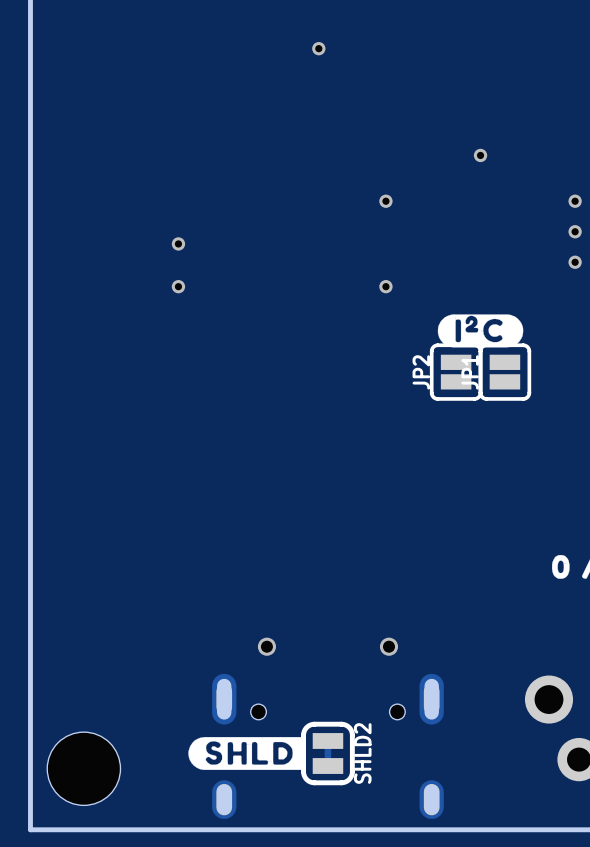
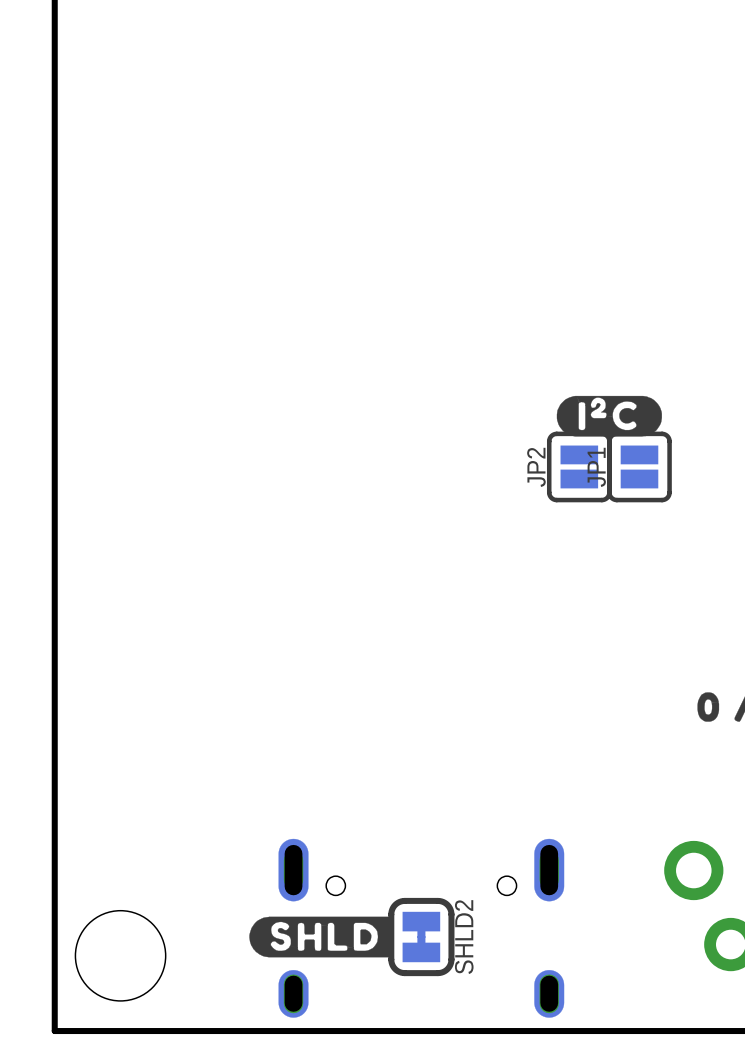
via: (318, 48) -> none
via: (480, 155) -> none
via: (385, 201) -> none
via: (575, 201) -> none
via: (575, 231) -> none
via: (178, 243) -> none
via: (575, 262) -> none
via: (178, 286) -> none
via: (385, 286) -> none
via: (266, 646) -> none
via: (388, 646) -> none

